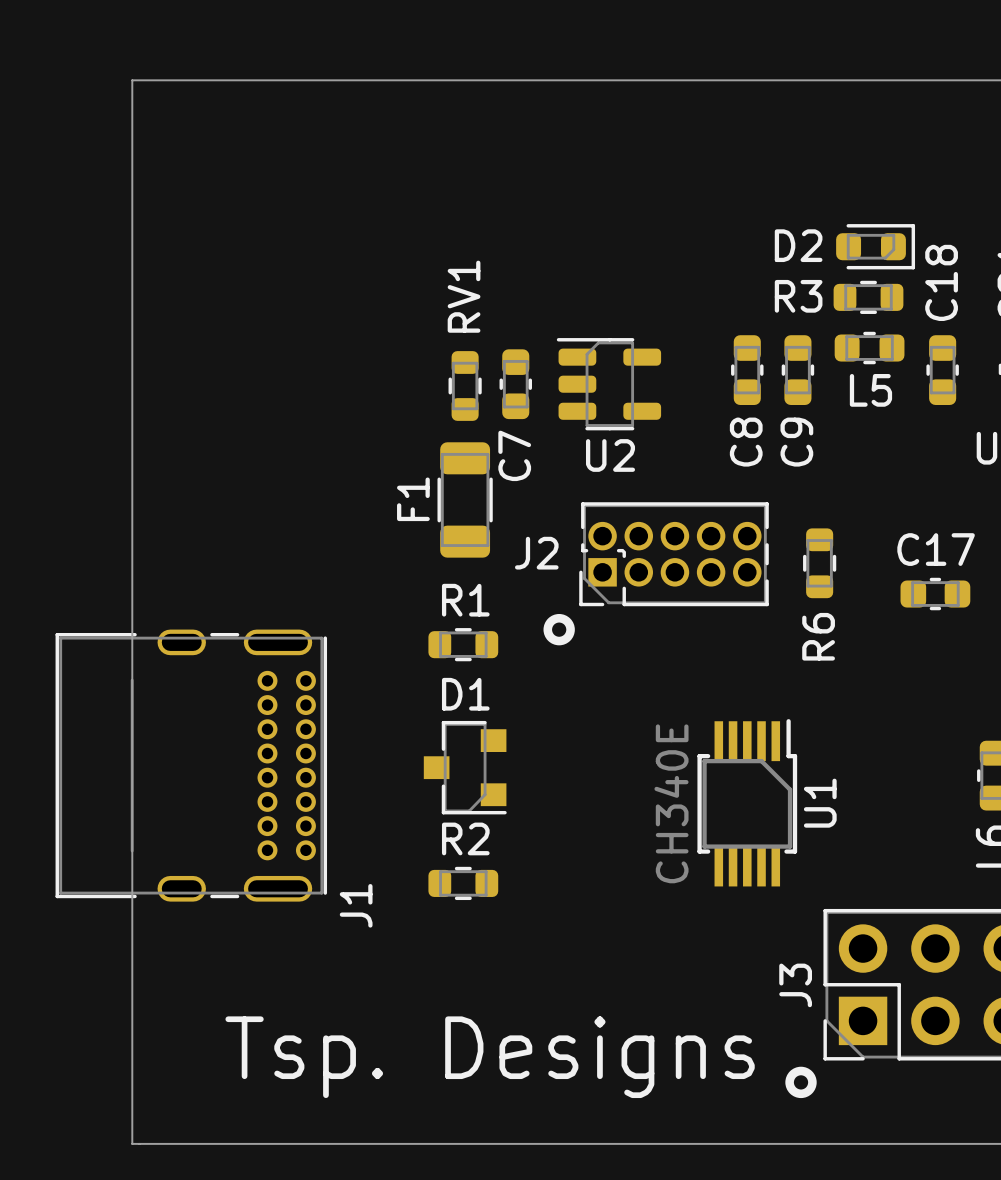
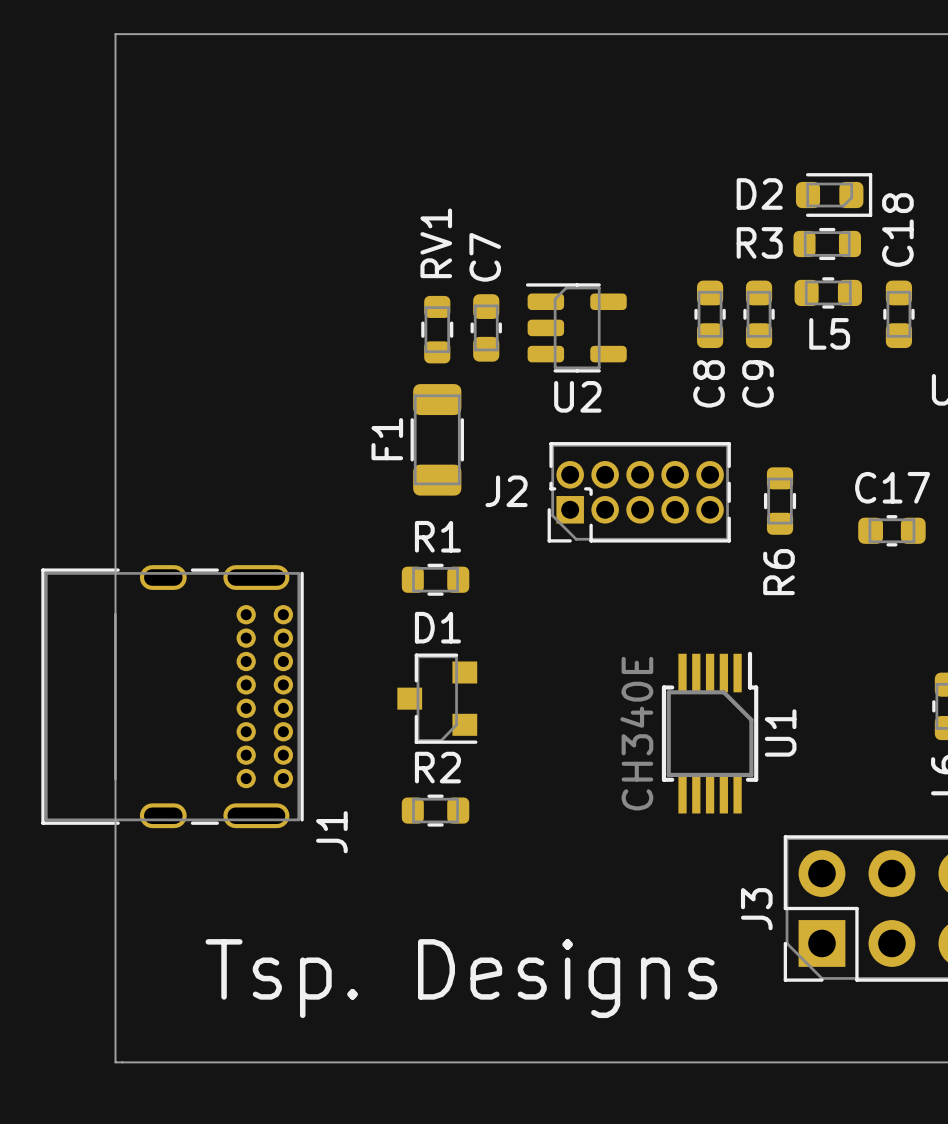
C7 name position: C7 (514, 455) -> C7 (485, 257)
drawing: [543, 613, 575, 646] -> none
drawing: [785, 1066, 817, 1099] -> none

